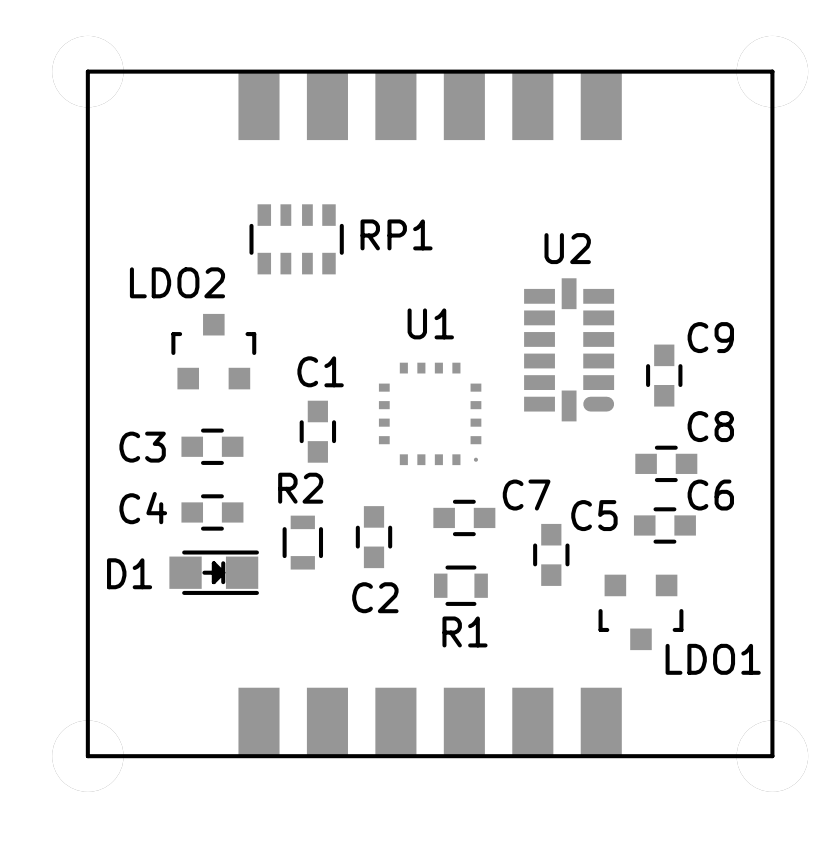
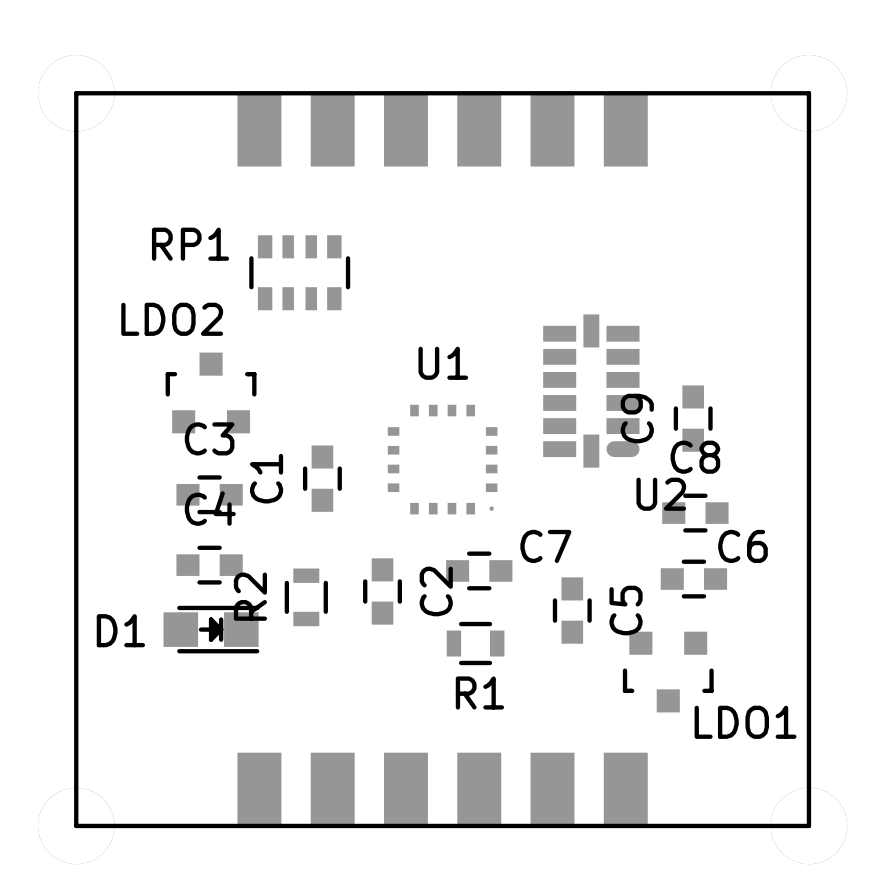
RP1 name position: RP1 (396, 234) -> RP1 (190, 244)
U2 name position: U2 (567, 248) -> U2 (661, 494)
C9 name rotation: 0° (710, 337) -> 90° counterclockwise (637, 418)
C9 name position: C9 (710, 337) -> C9 (637, 418)
C1 name rotation: 0° (320, 371) -> 90° counterclockwise (266, 478)
C1 name position: C1 (320, 371) -> C1 (266, 478)
C8 name position: C8 (710, 426) -> C8 (695, 457)
C3 name position: C3 (142, 447) -> C3 (209, 438)
R2 name rotation: 0° (300, 488) -> 90° counterclockwise (250, 596)
R2 name position: R2 (300, 488) -> R2 (250, 596)
C4 name position: C4 (143, 508) -> C4 (210, 508)
C5 name rotation: 0° (594, 515) -> 90° counterclockwise (626, 610)
C2 name rotation: 0° (375, 597) -> 90° counterclockwise (436, 591)
C2 name position: C2 (375, 597) -> C2 (436, 591)

